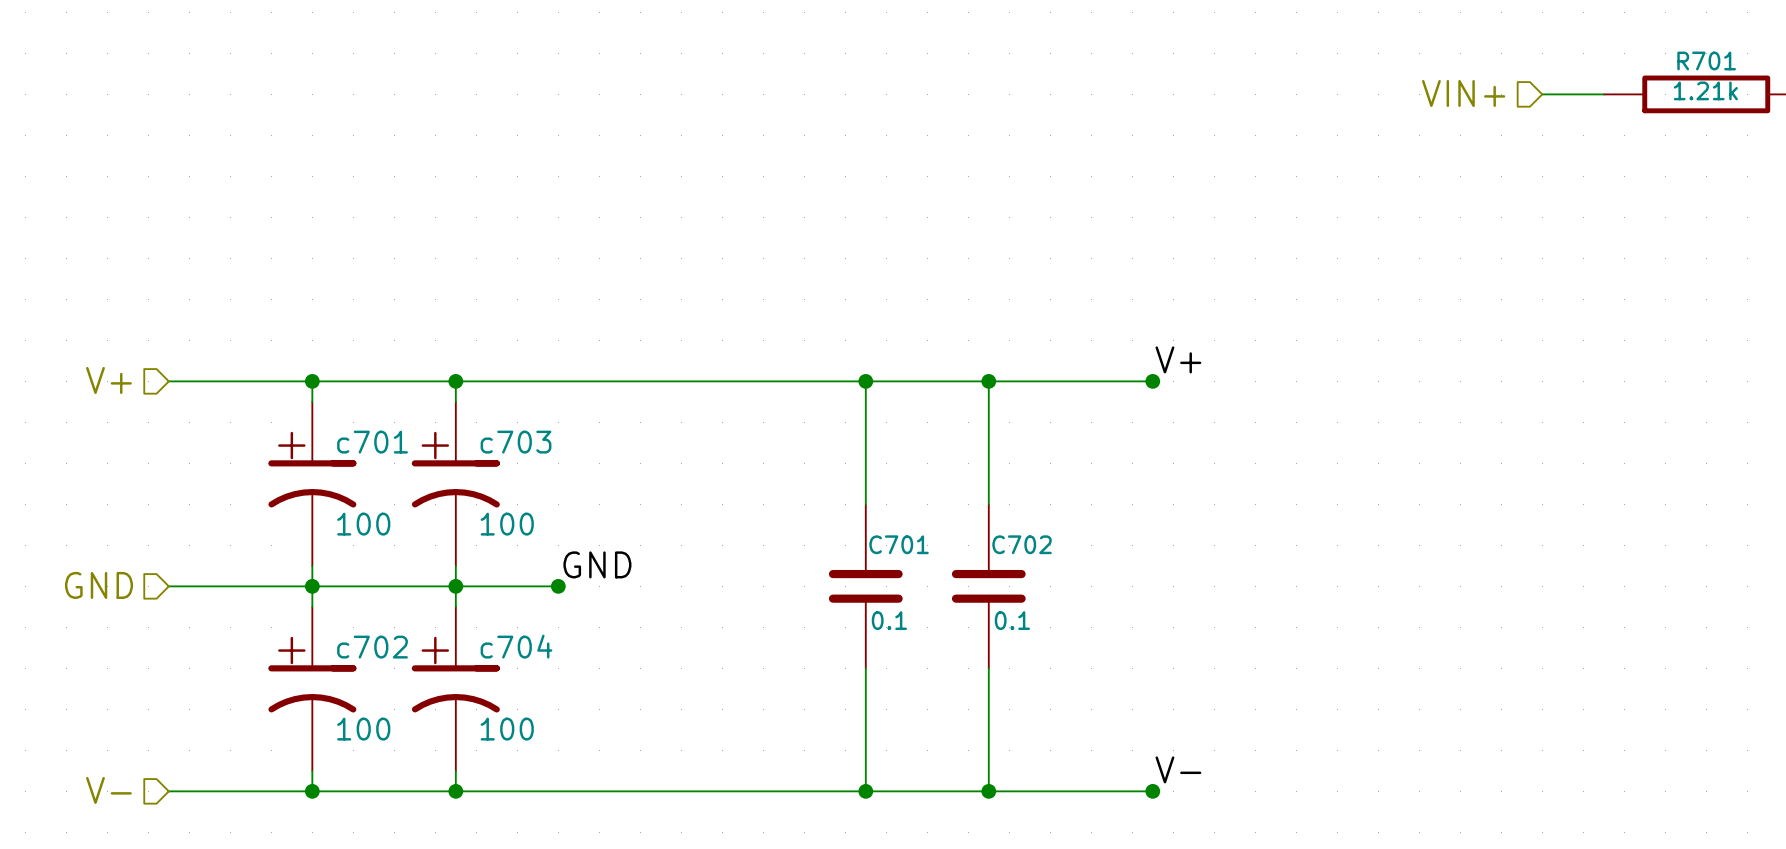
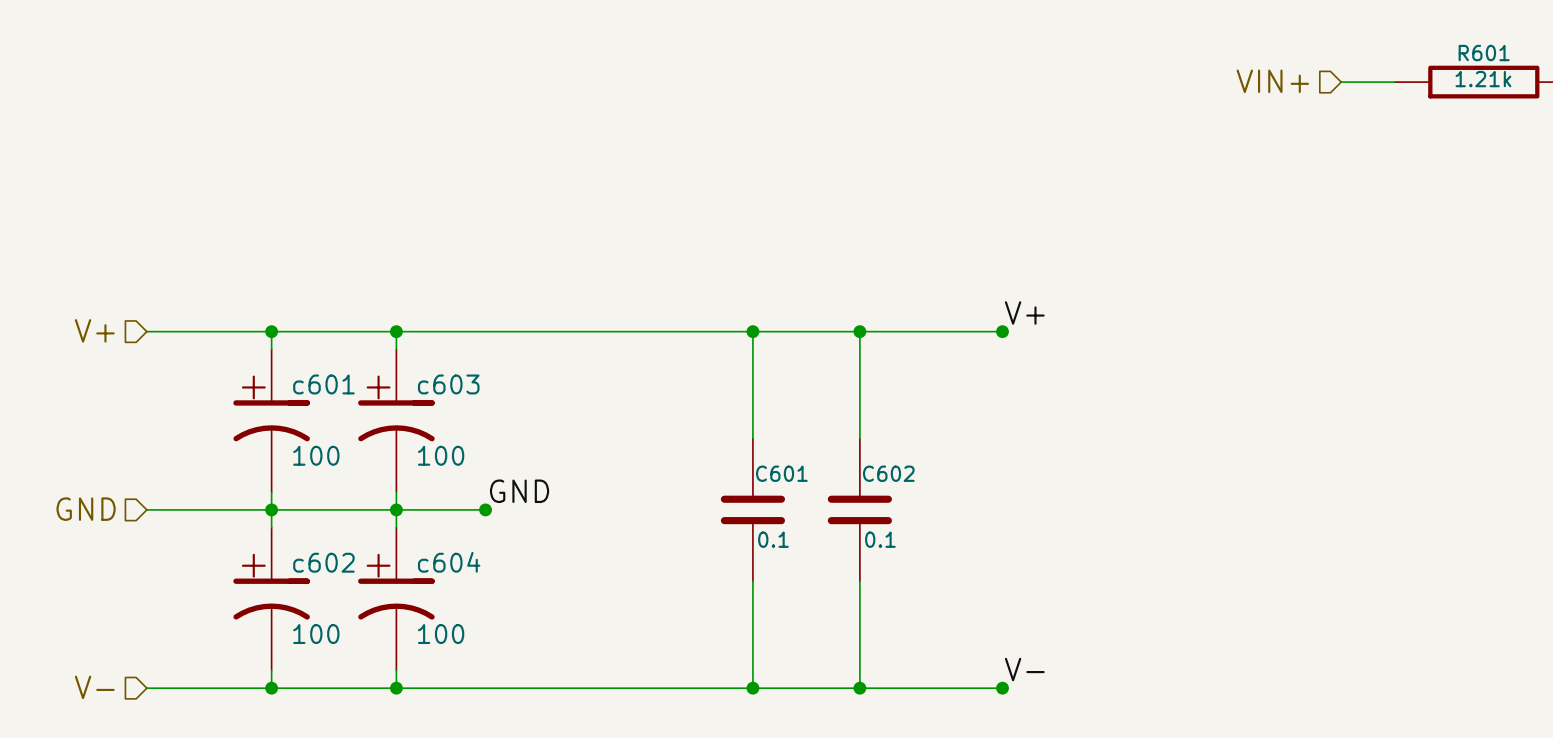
R701 name: R701 (1706, 60) -> R601 (1484, 53)
c701 name: c701 (372, 442) -> c601 (323, 384)
c703 name: c703 (516, 442) -> c603 (448, 384)
C701 name: C701 (899, 544) -> C601 (781, 473)
C702 name: C702 (1022, 544) -> C602 (888, 473)
c704 name: c704 (516, 646) -> c604 (449, 562)
c702 name: c702 (372, 647) -> c602 (323, 562)

